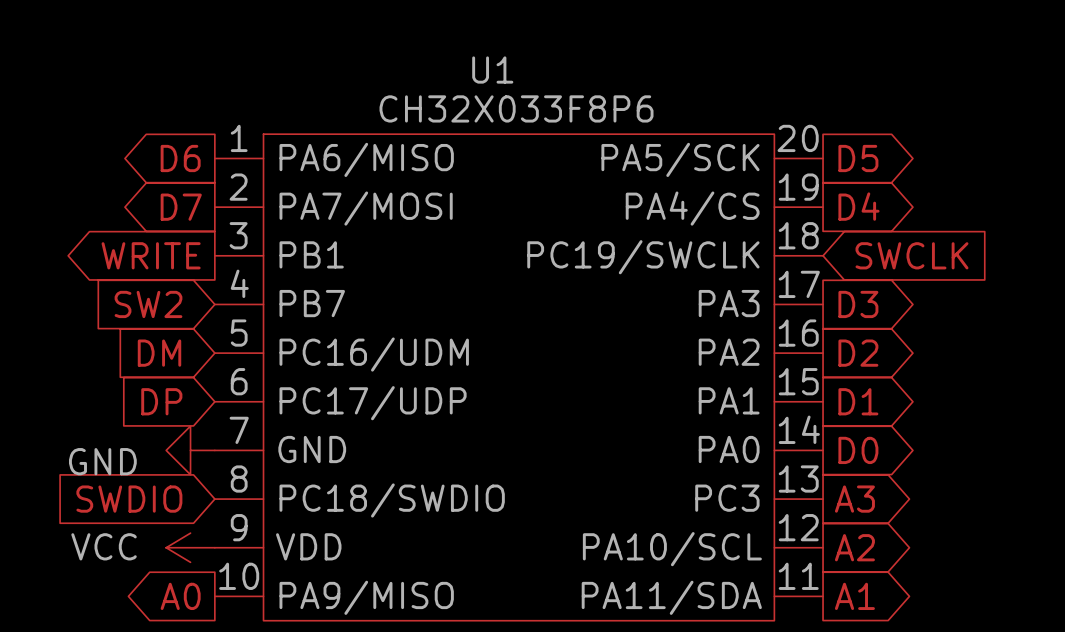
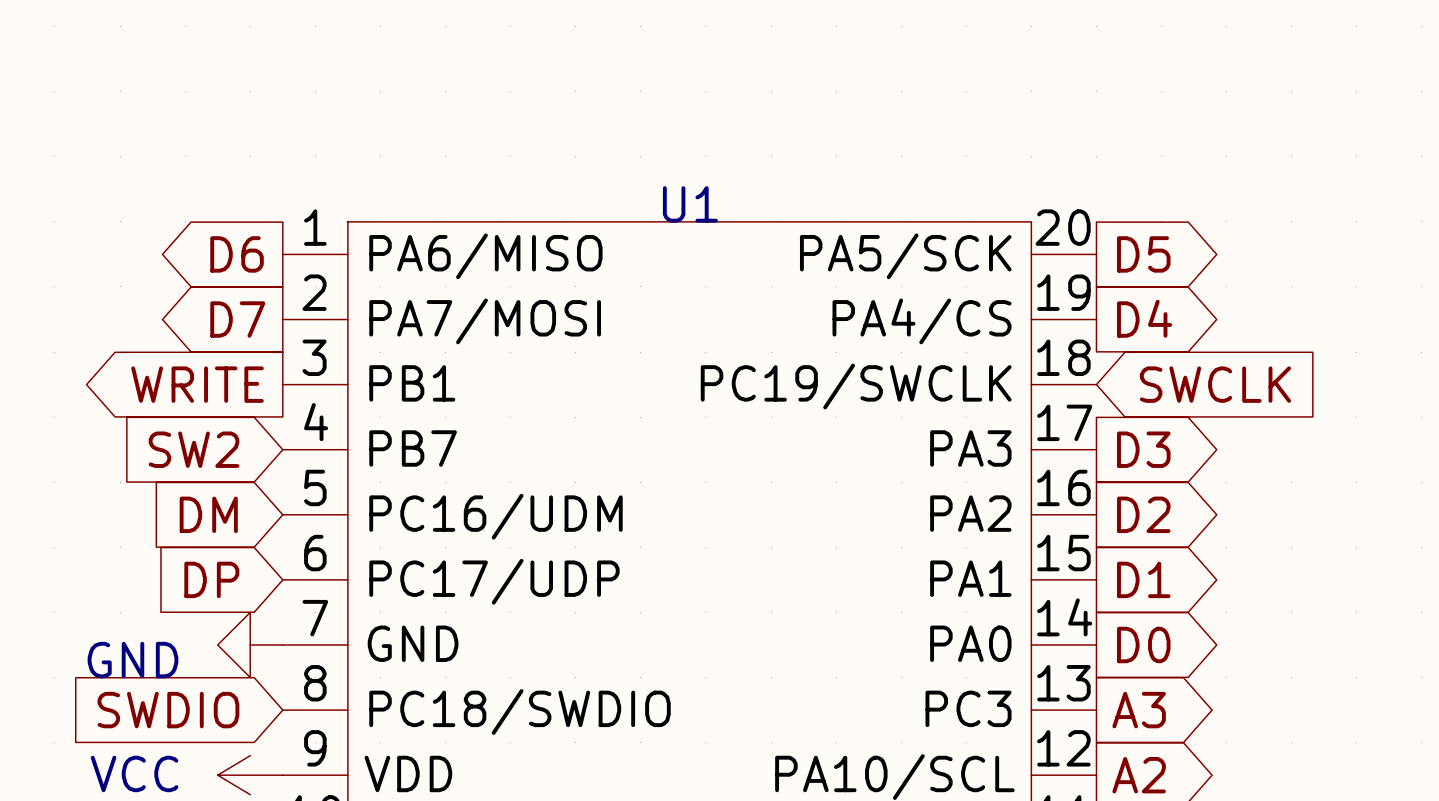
U1 name position: U1 (492, 70) -> U1 (690, 204)
U1 value: CH32X033F8P6 (516, 108) -> none

